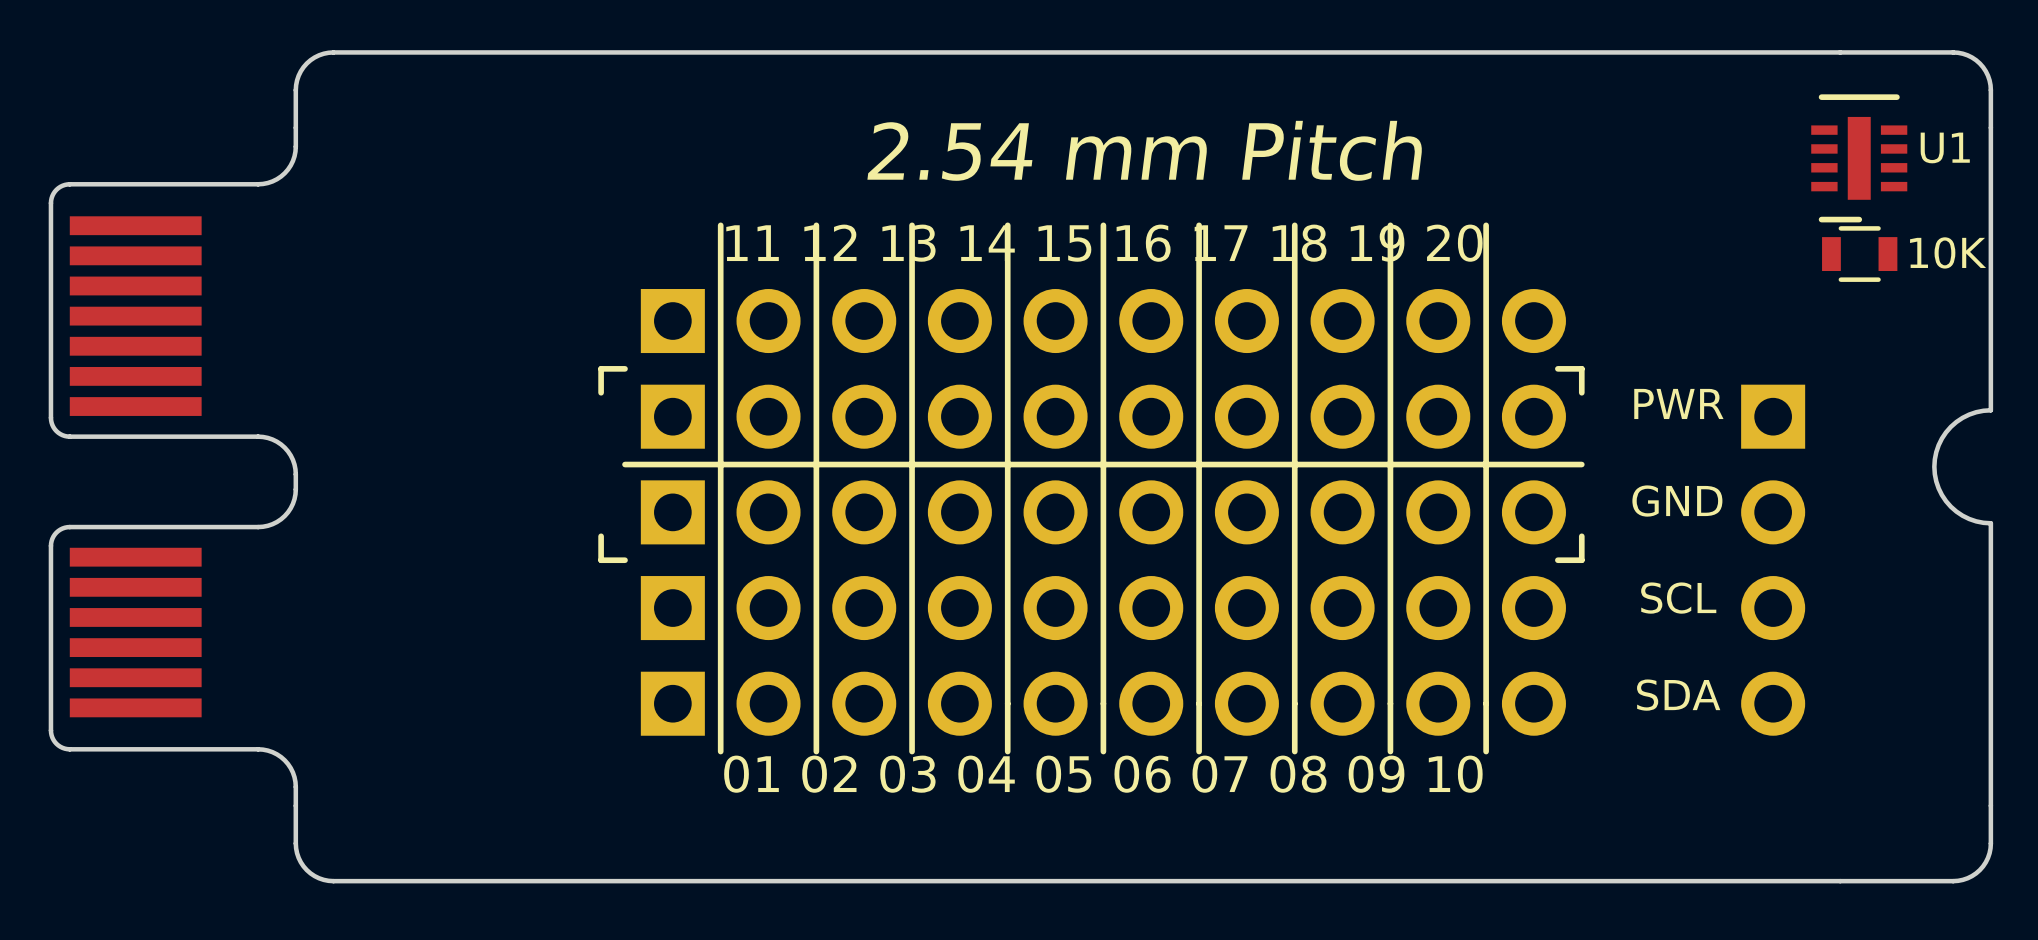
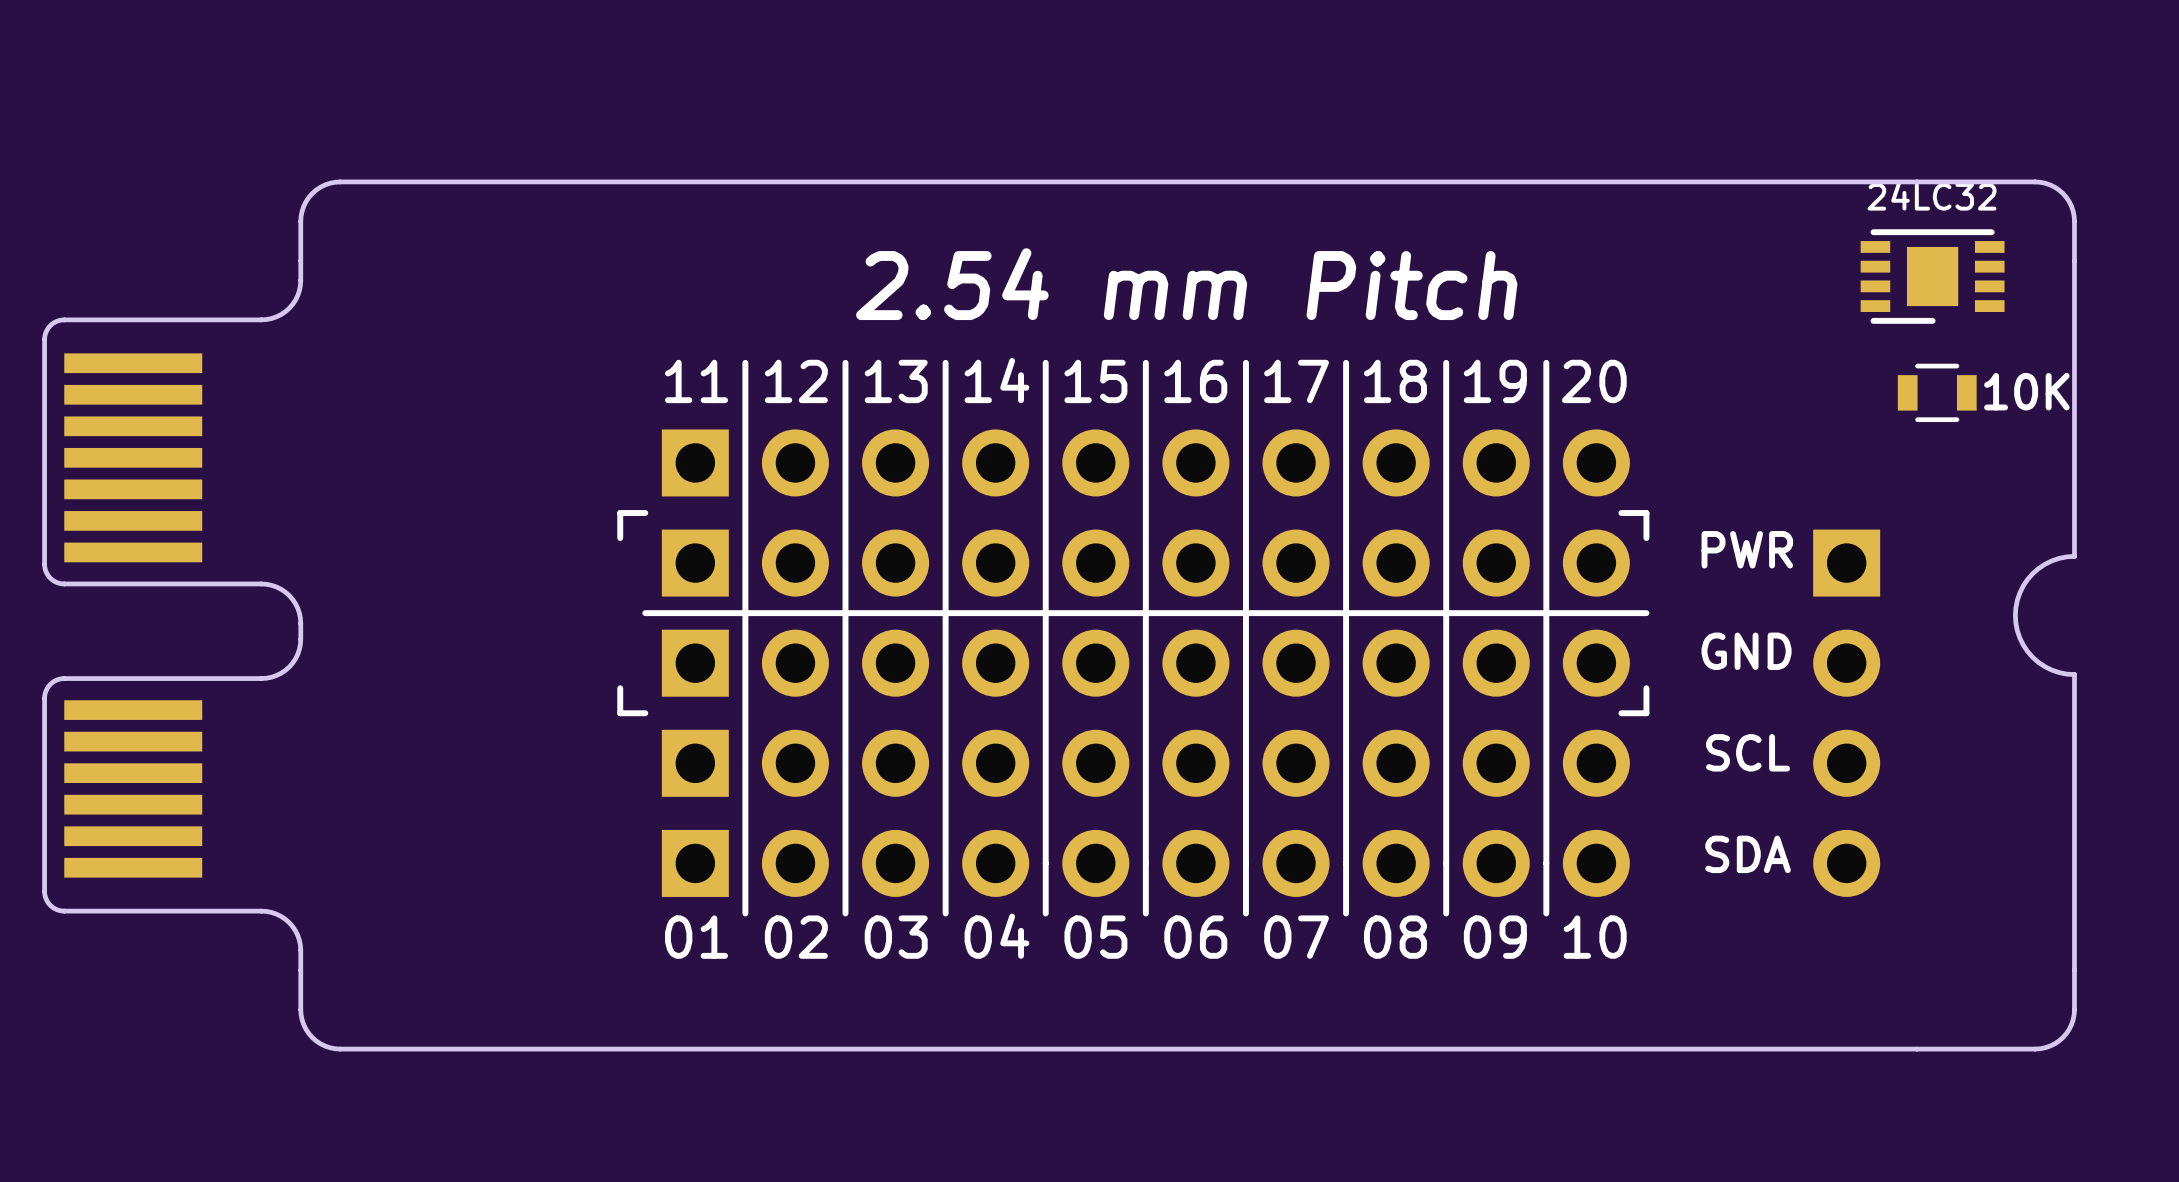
part: none -> 24LC32 (1932, 276)
U1: (1859, 158) -> none

